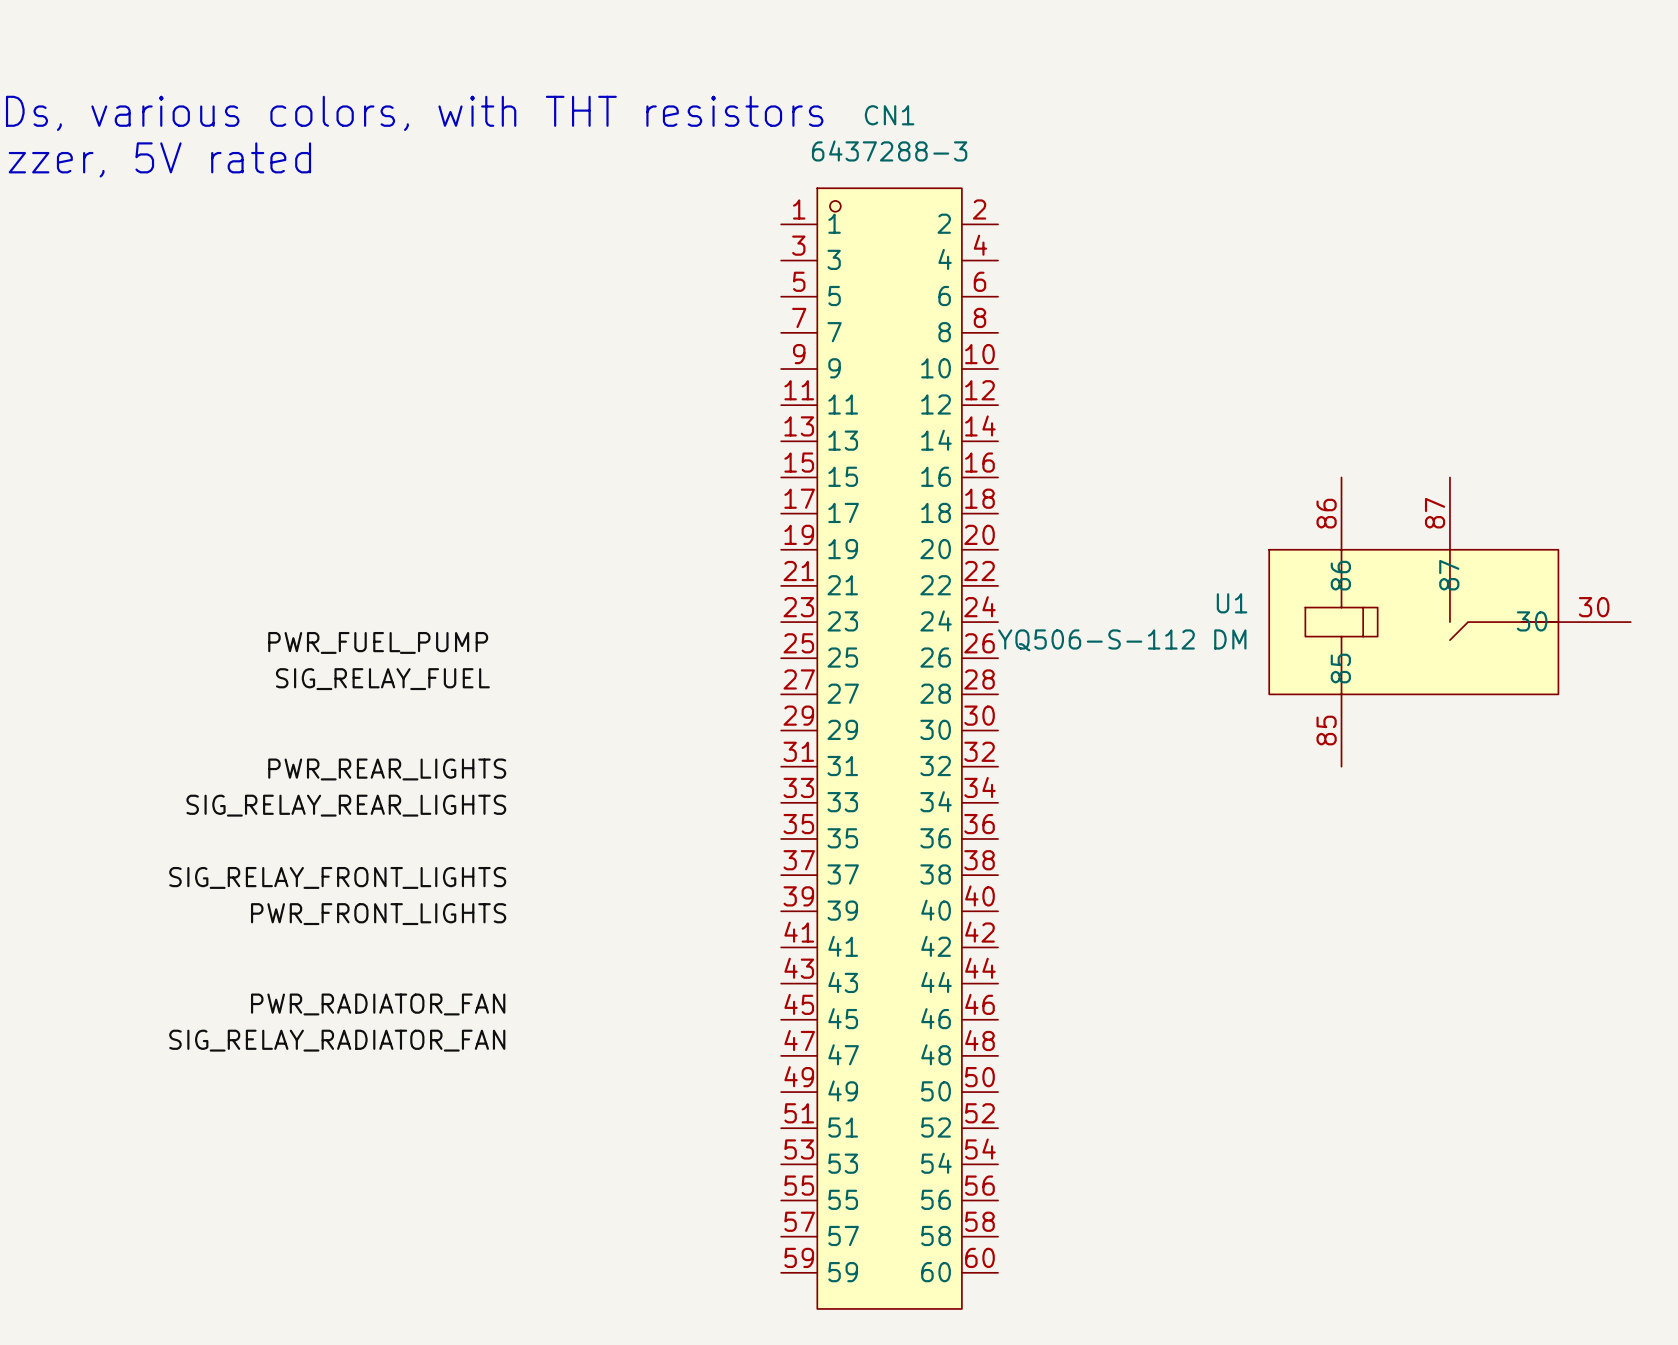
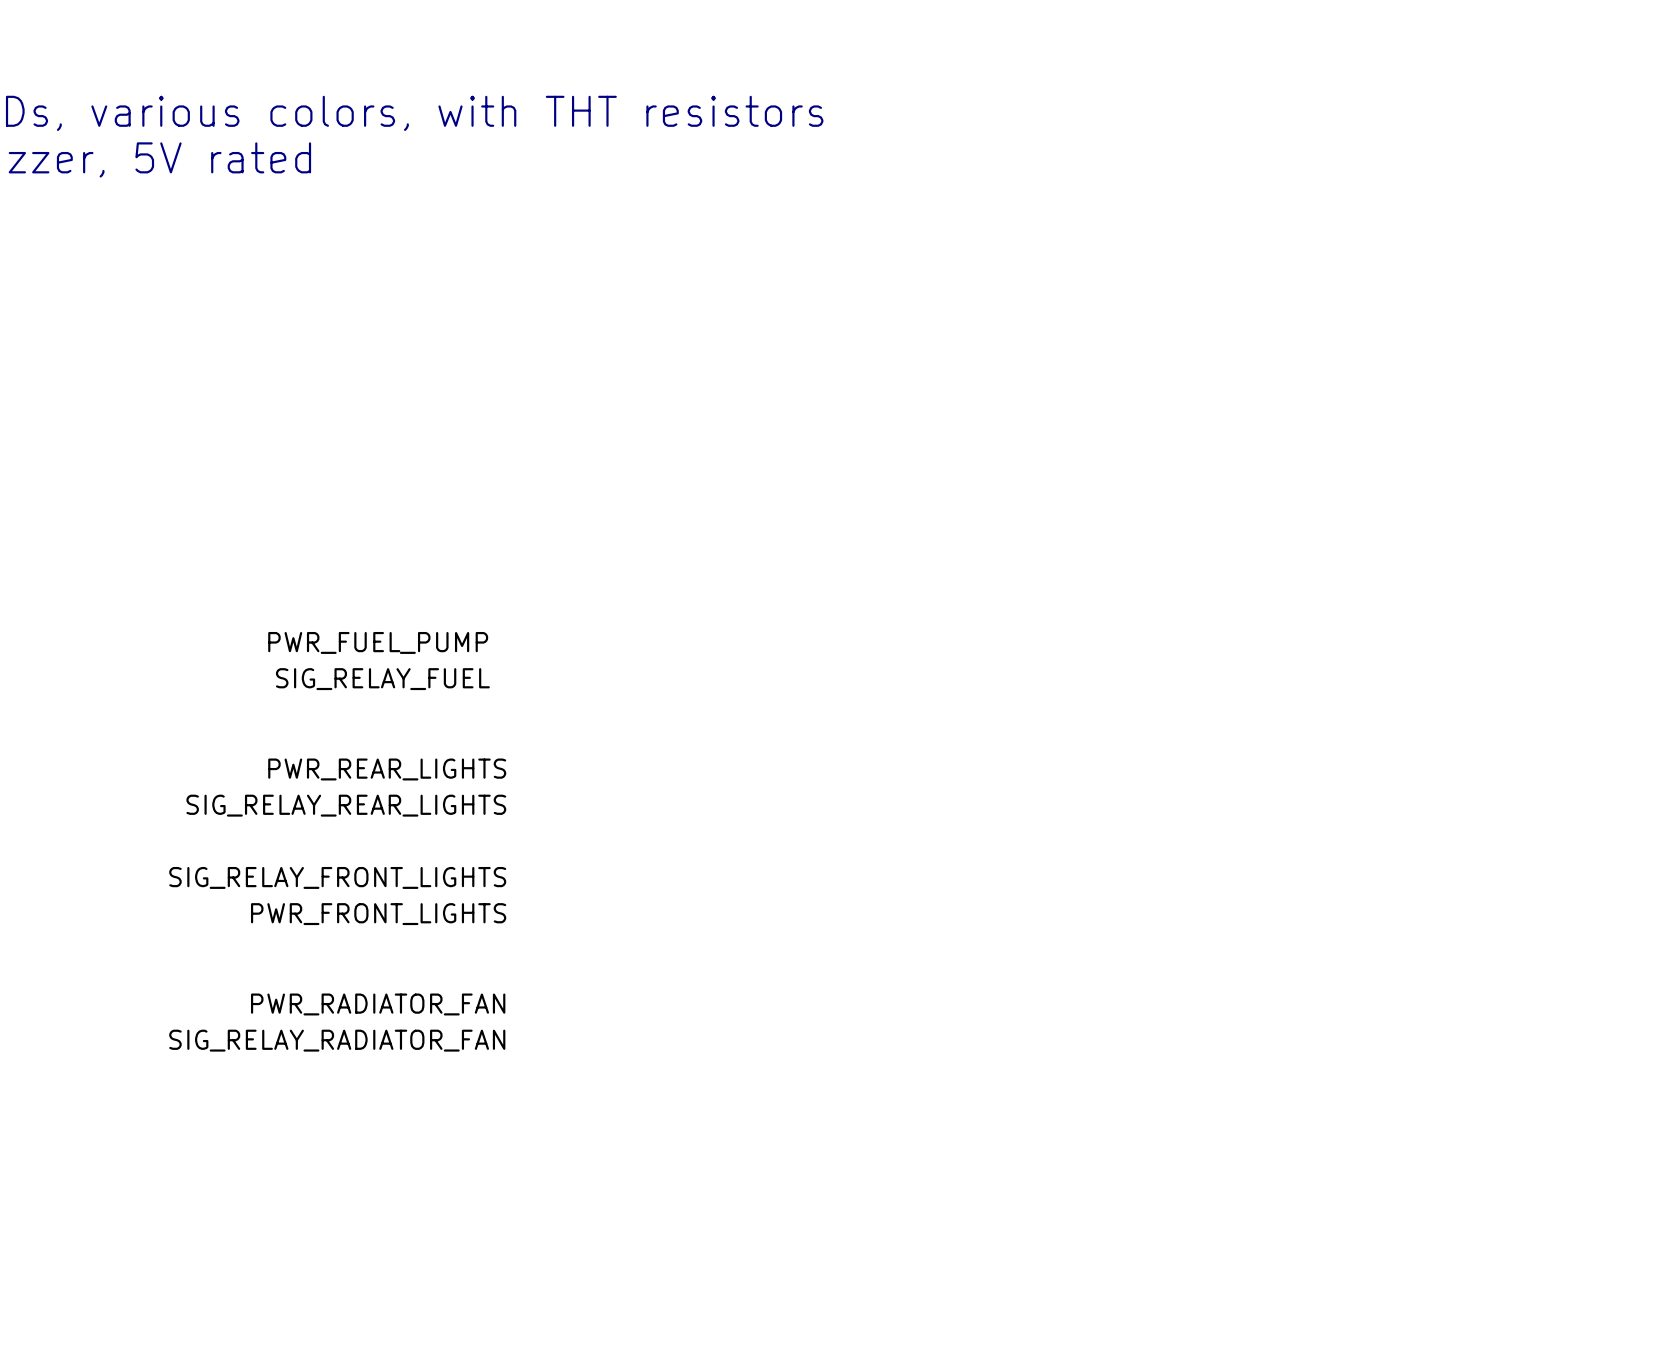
U1: YQ506-S-112 DM (1449, 622) -> none
CN1: 6437288-3 (889, 748) -> none

